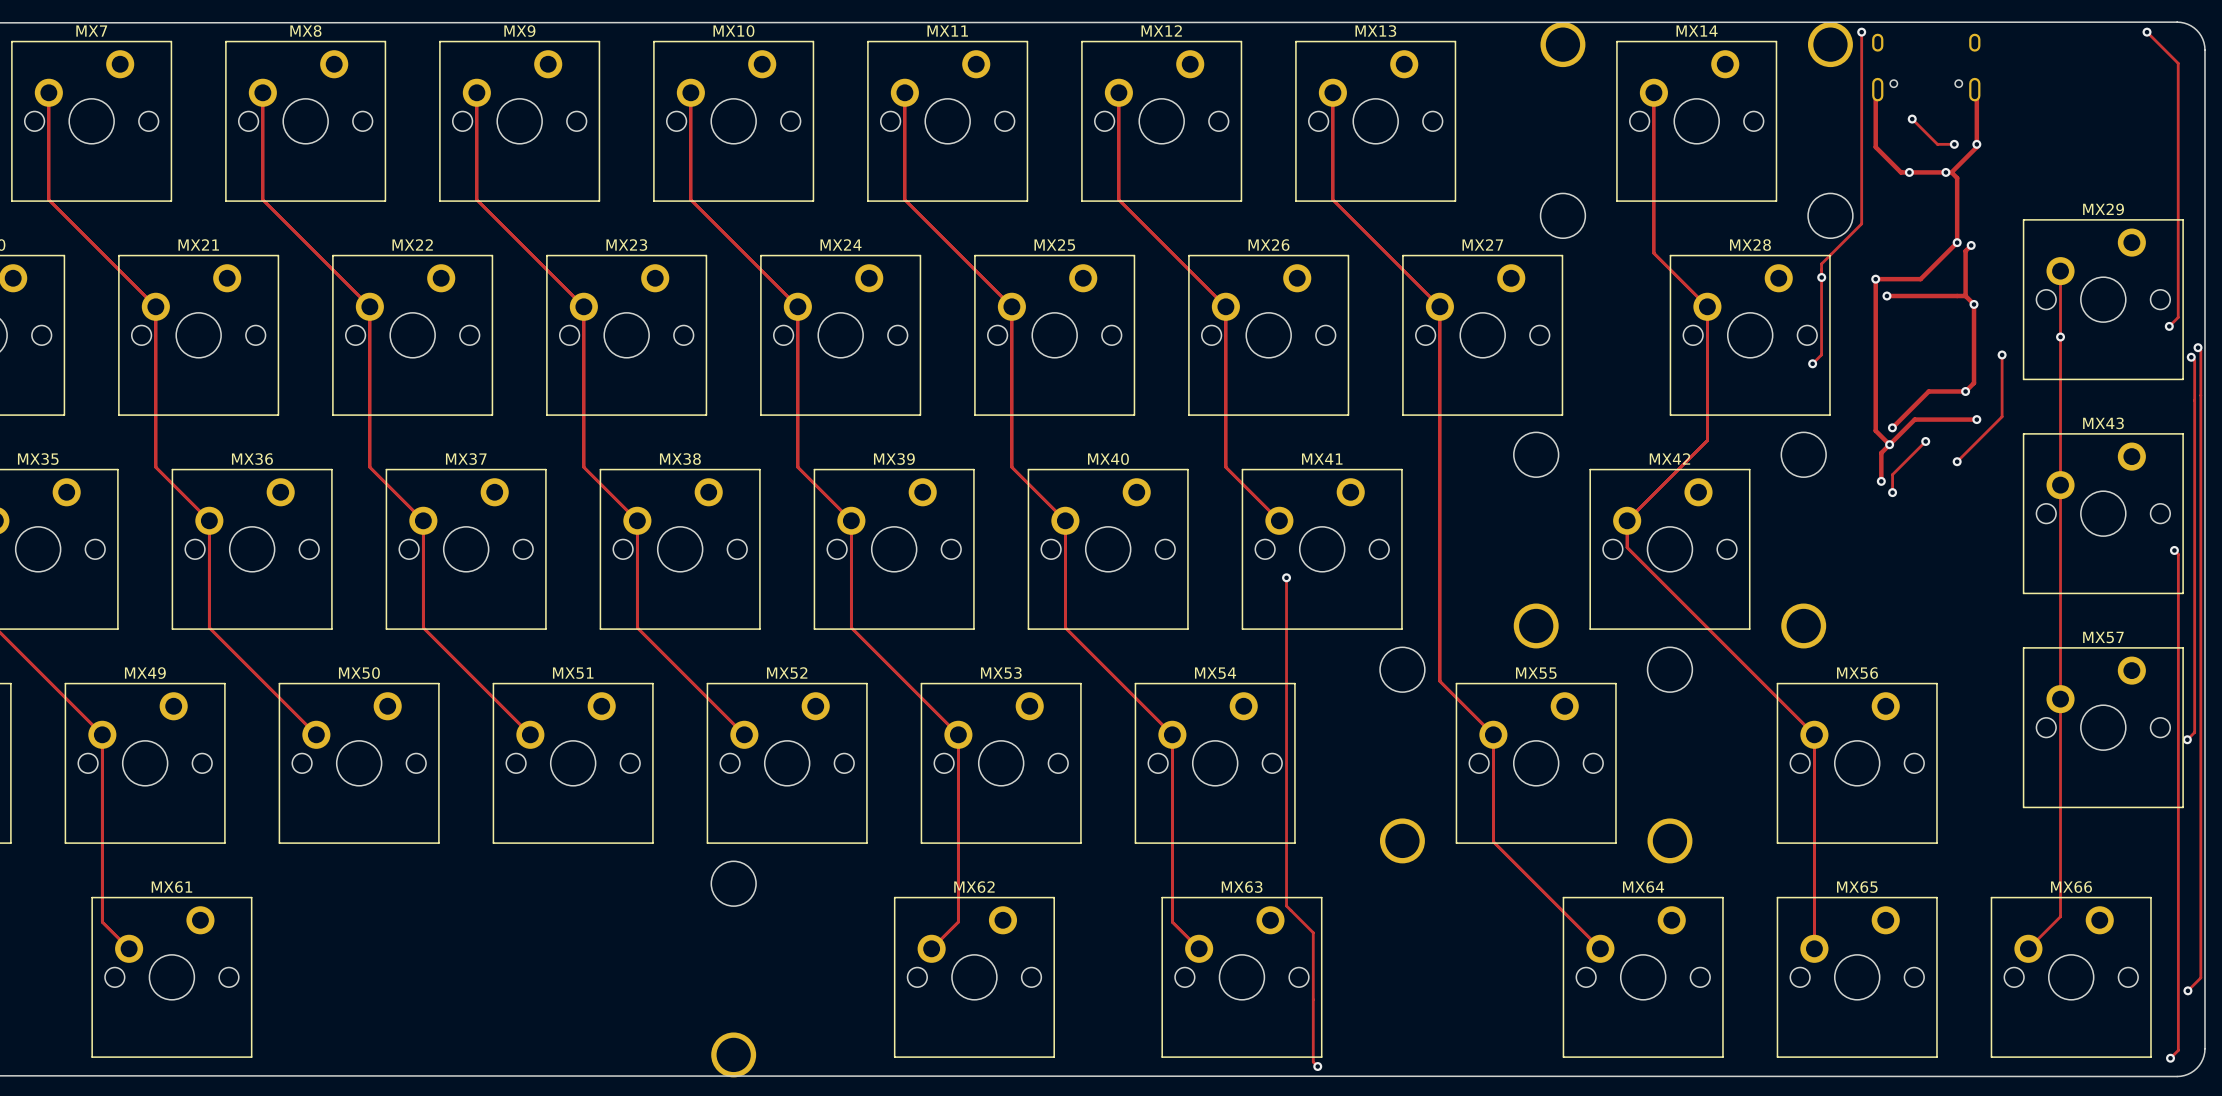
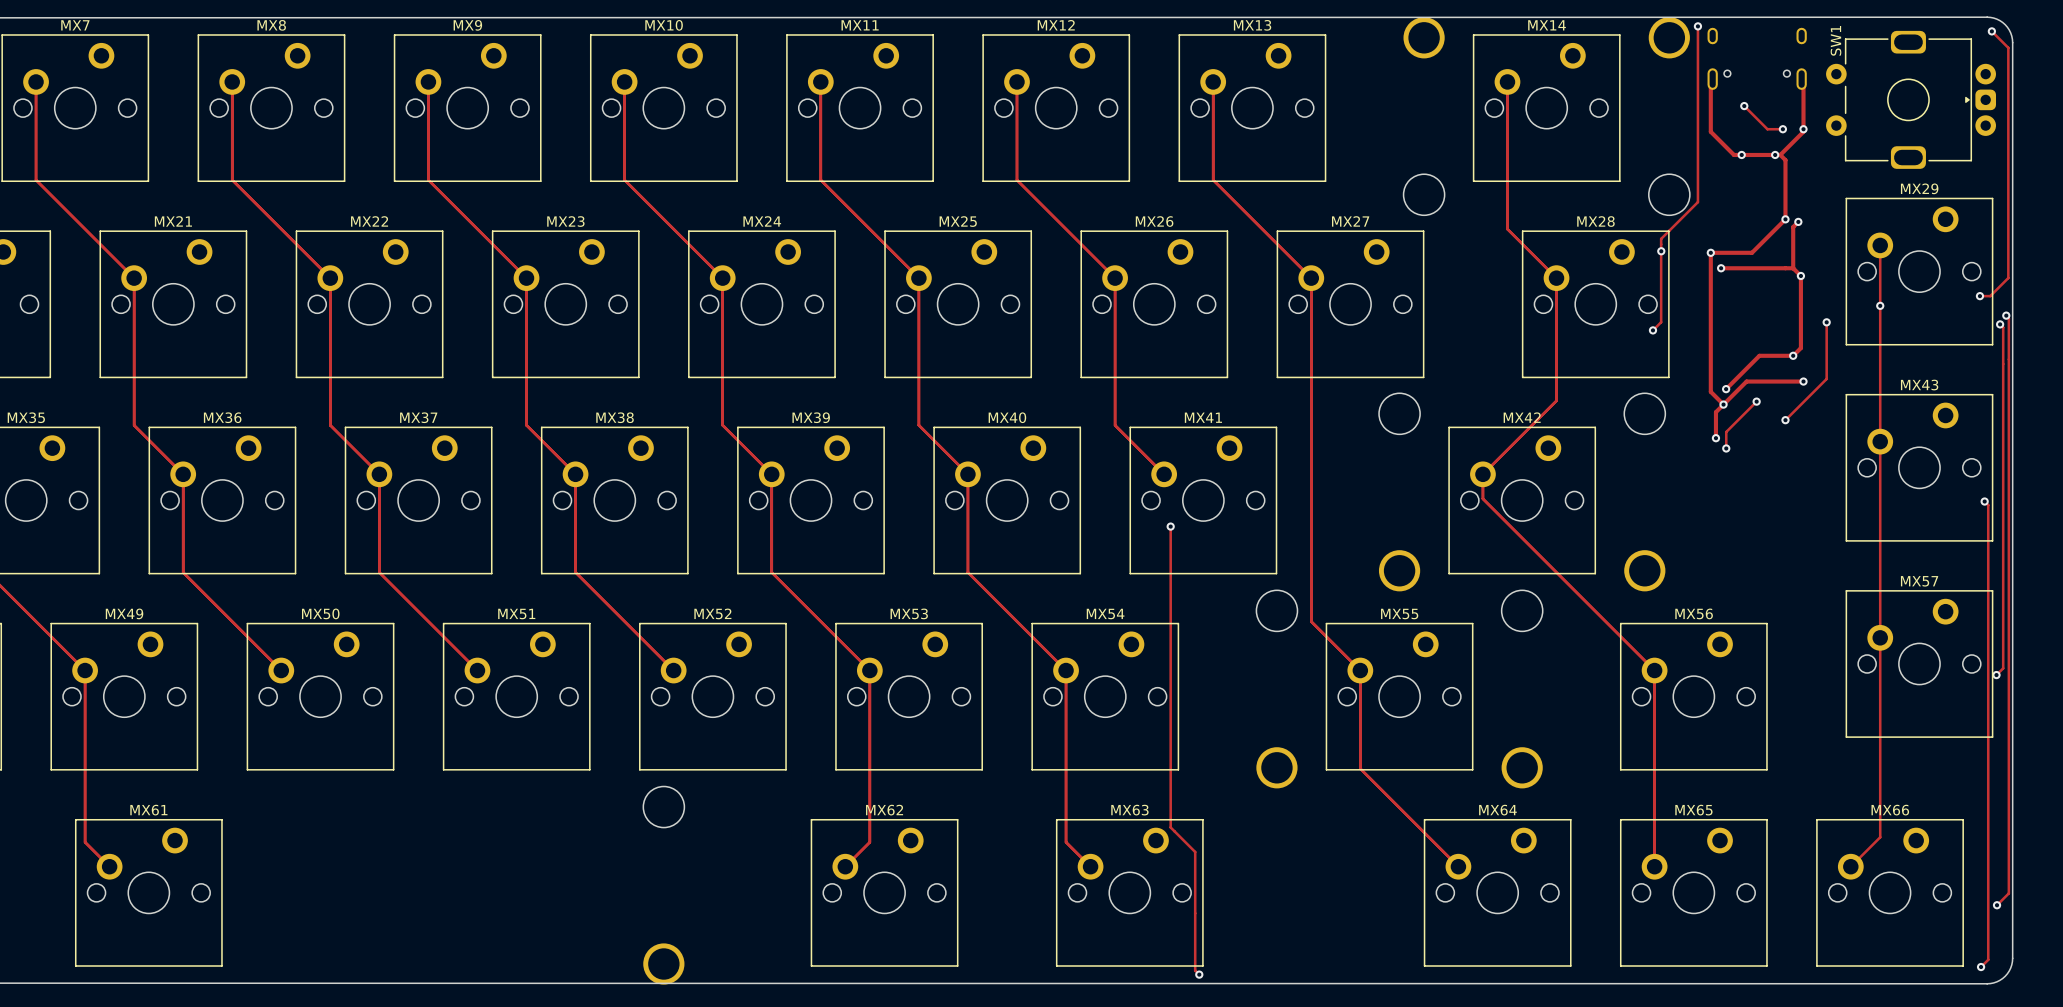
track: (2147, 32) (2178, 63) (2178, 317) (2169, 326) -> (1991, 31) (2008, 47) (2008, 278) (1990, 296) (1979, 296)
via position: (2147, 32) -> (1991, 31)
SW1: none -> (1911, 99)

